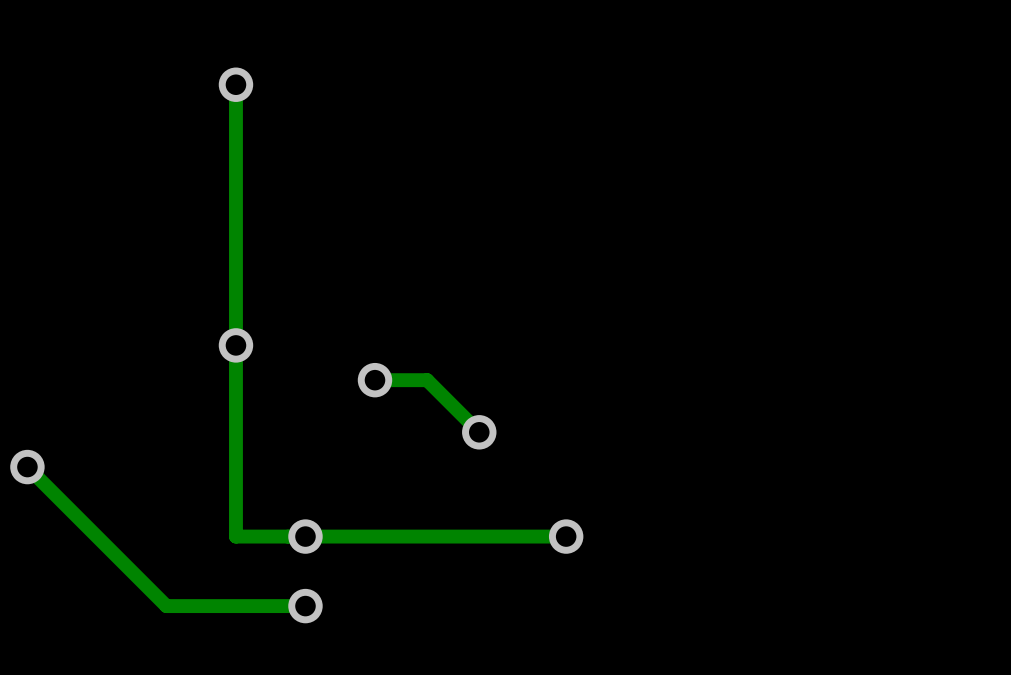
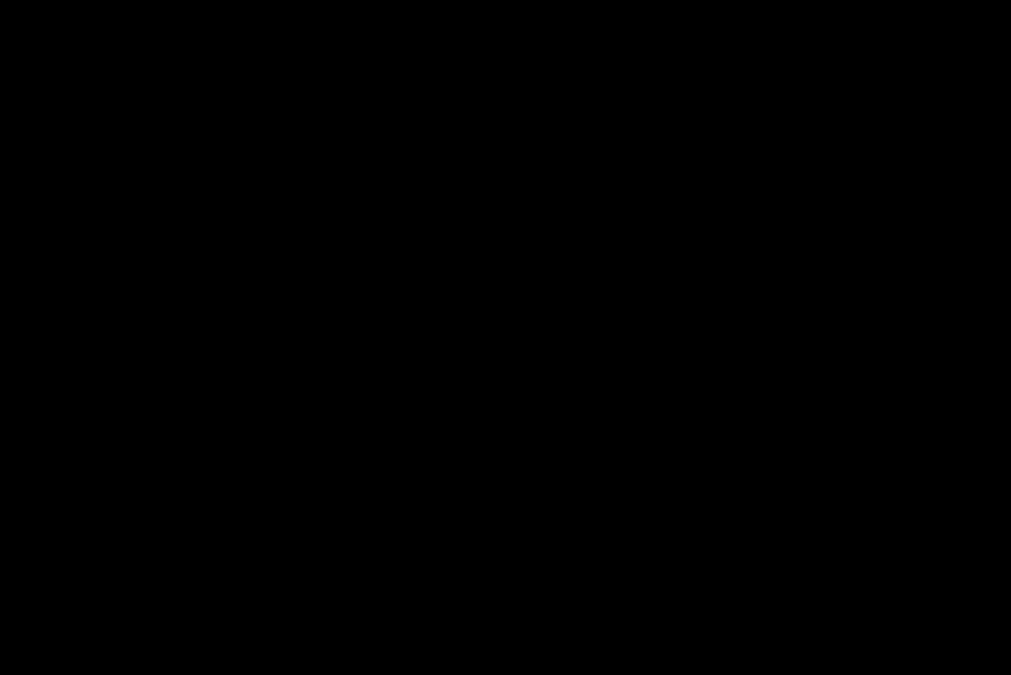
track: (235, 84) (235, 536) (566, 536) -> none
via: (235, 84) -> none
via: (235, 345) -> none
track: (374, 380) (427, 380) (479, 432) -> none
via: (374, 380) -> none
via: (479, 432) -> none
track: (27, 467) (166, 606) (305, 606) -> none
via: (27, 467) -> none
via: (305, 536) -> none
via: (566, 536) -> none
via: (305, 606) -> none

